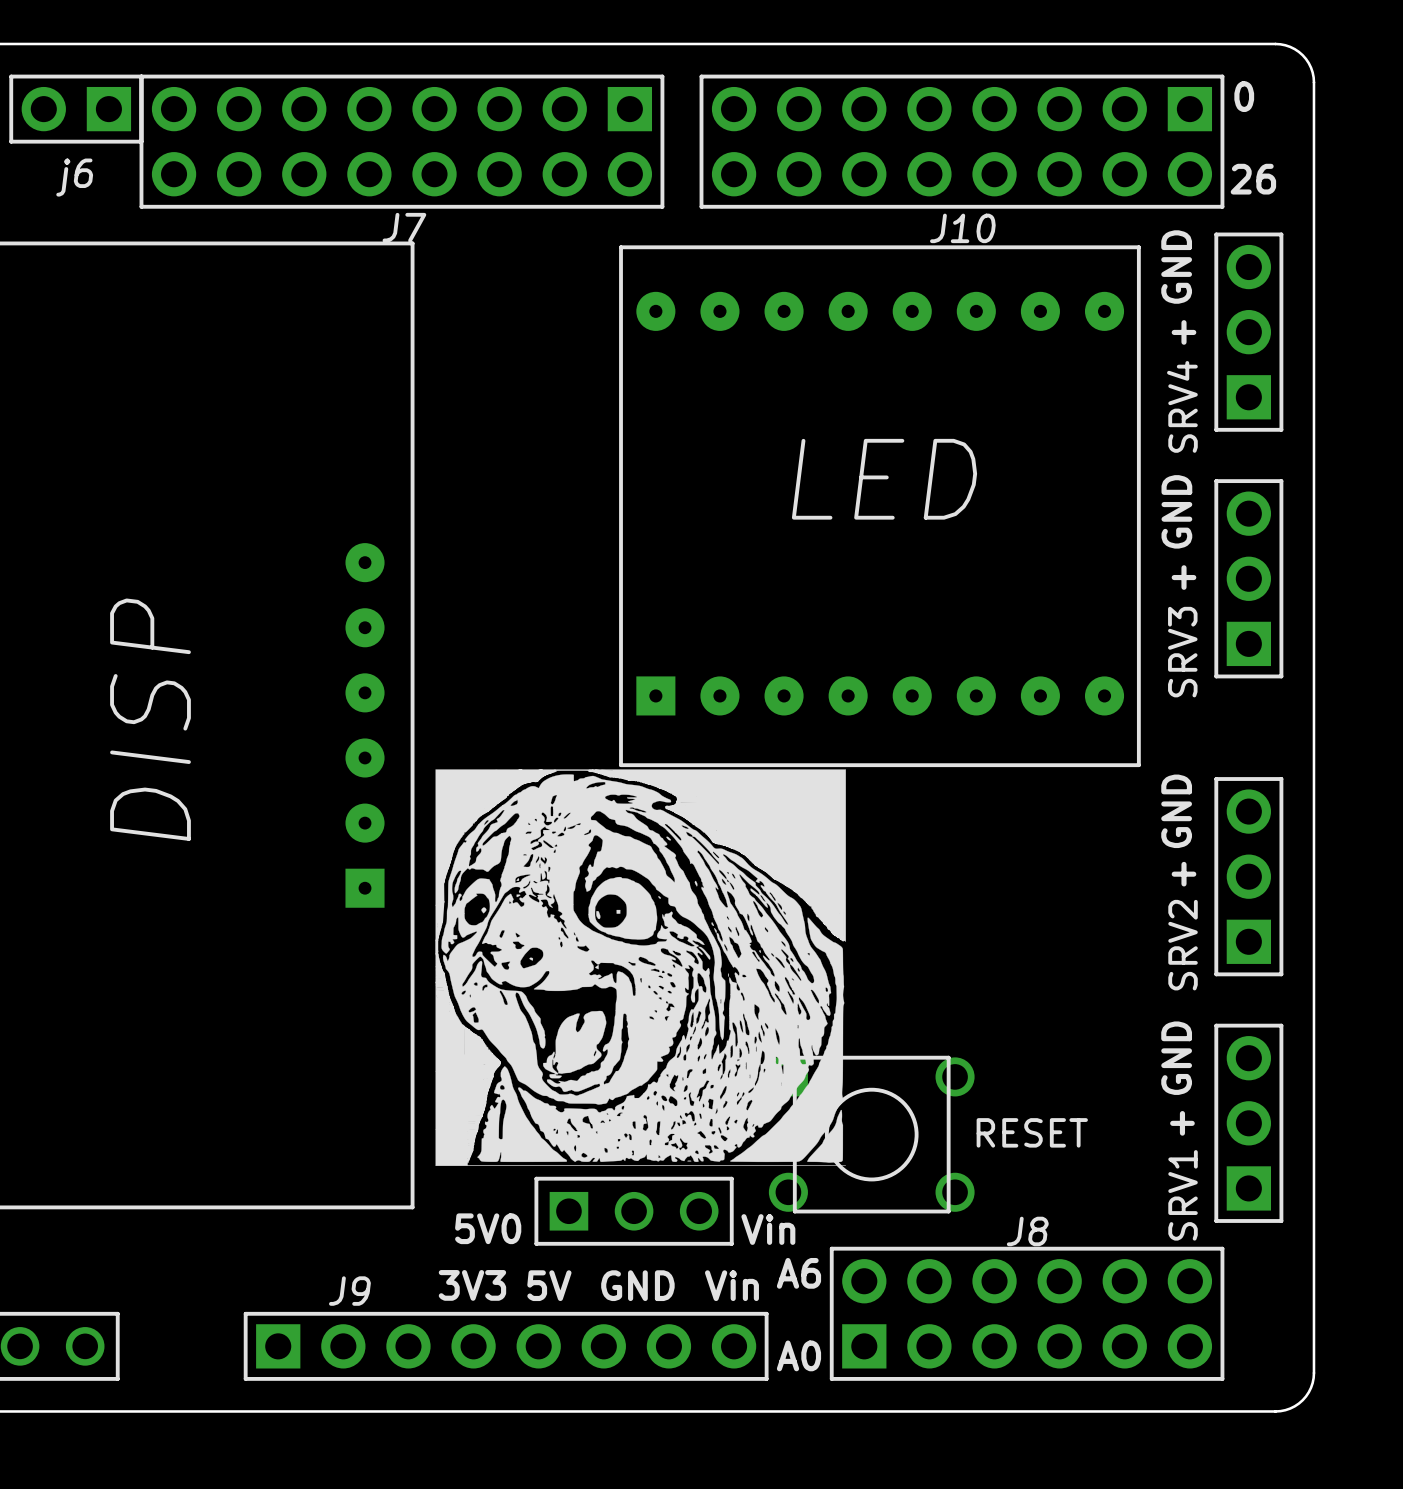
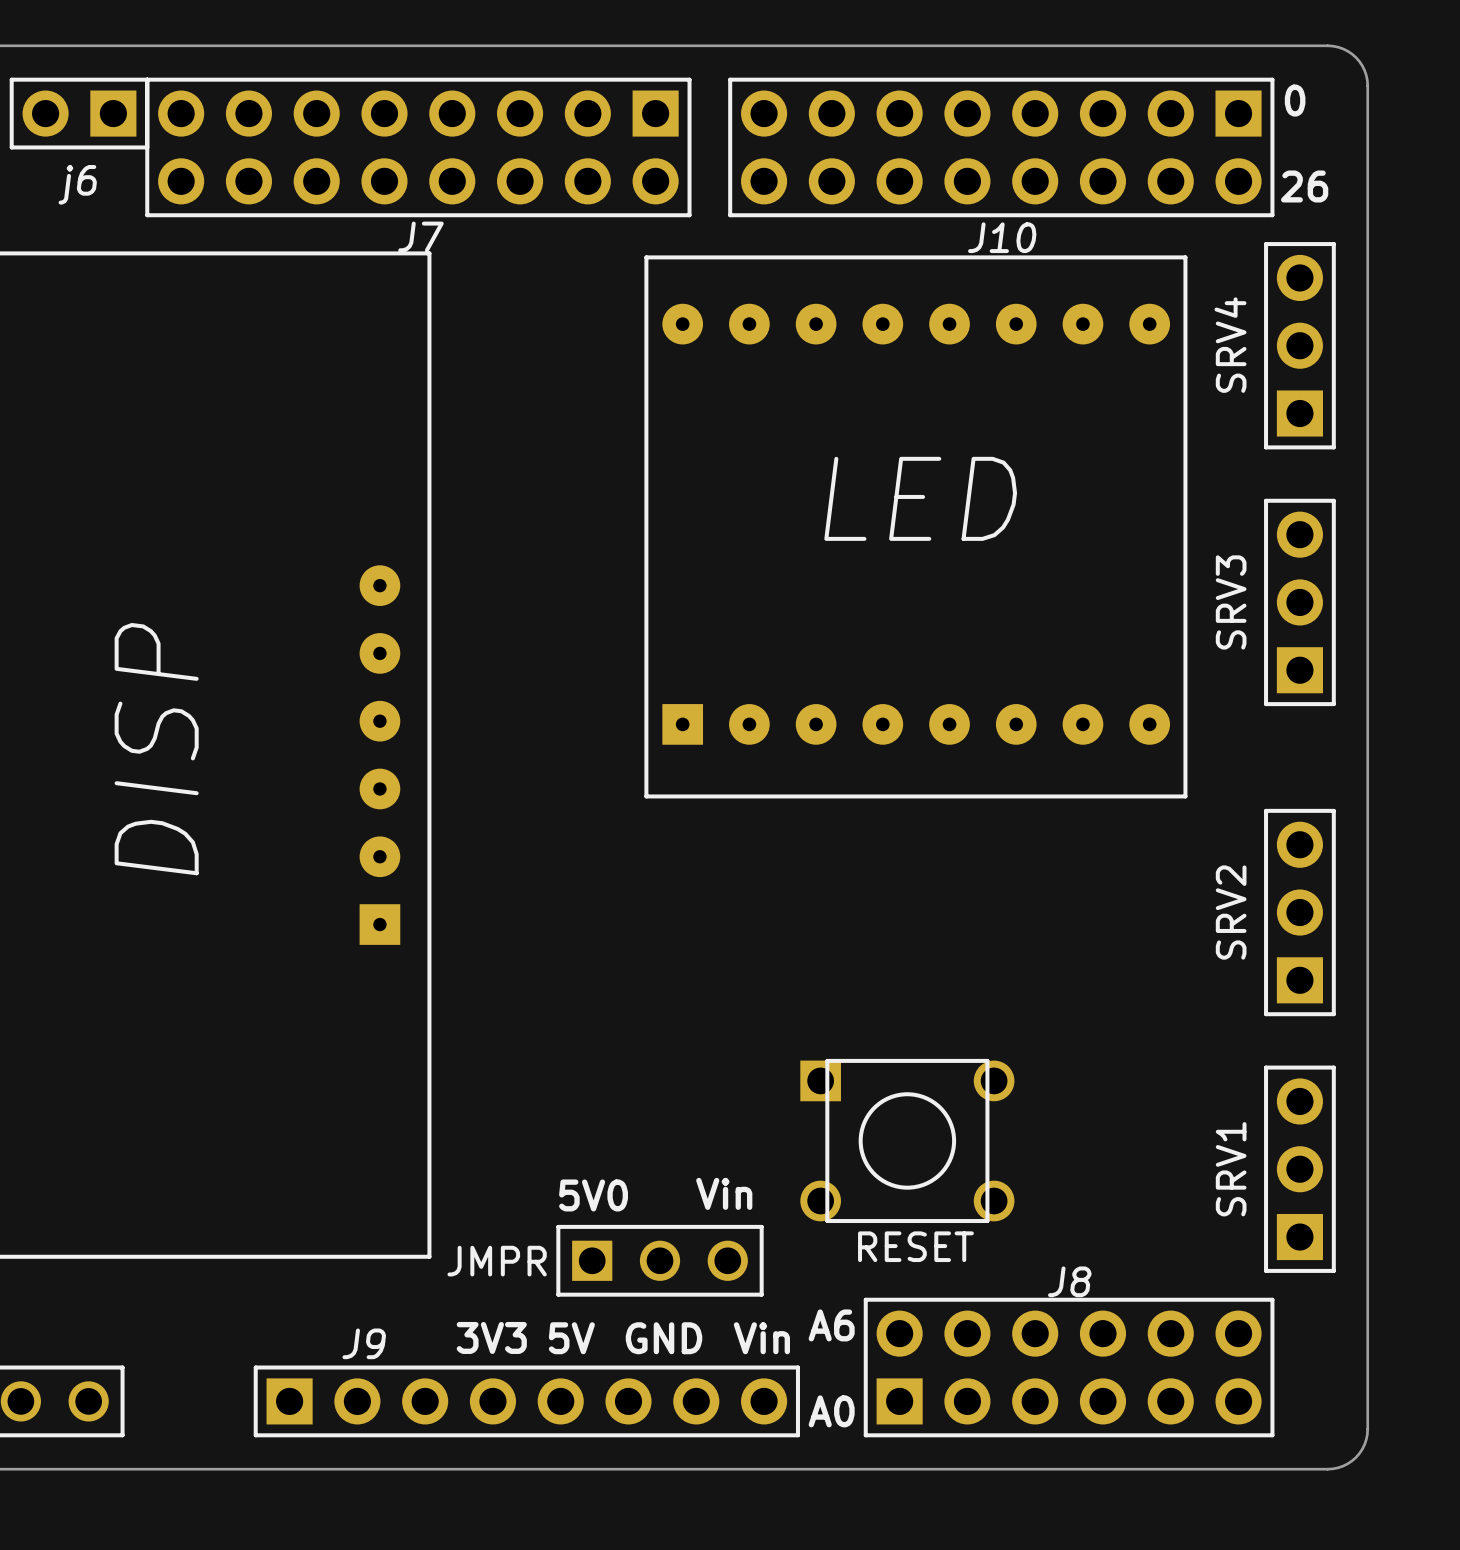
text: GND (1176, 267) -> none
text: + (1183, 332) -> none
SRV4 name position: SRV4 (1182, 406) -> SRV4 (1230, 345)
text: GND (1176, 511) -> none
text: + (1183, 577) -> none
SRV3 name position: SRV3 (1182, 652) -> SRV3 (1231, 602)
drawing: [435, 769, 846, 1166] -> none
text: GND (1176, 811) -> none
text: + (1183, 874) -> none
SRV2 name position: SRV2 (1183, 945) -> SRV2 (1231, 912)
text: GND (1176, 1058) -> none
text: + (1182, 1123) -> none
RESET name position: RESET (1032, 1132) -> RESET (915, 1246)
RESET position: (871, 1134) -> (907, 1140)
SRV1 name position: SRV1 (1183, 1195) -> SRV1 (1231, 1169)
JMPR name: none -> JMPR (497, 1261)
text position: 5V0 (488, 1228) -> 5V0 (593, 1195)
text position: Vin (768, 1229) -> Vin (724, 1193)

